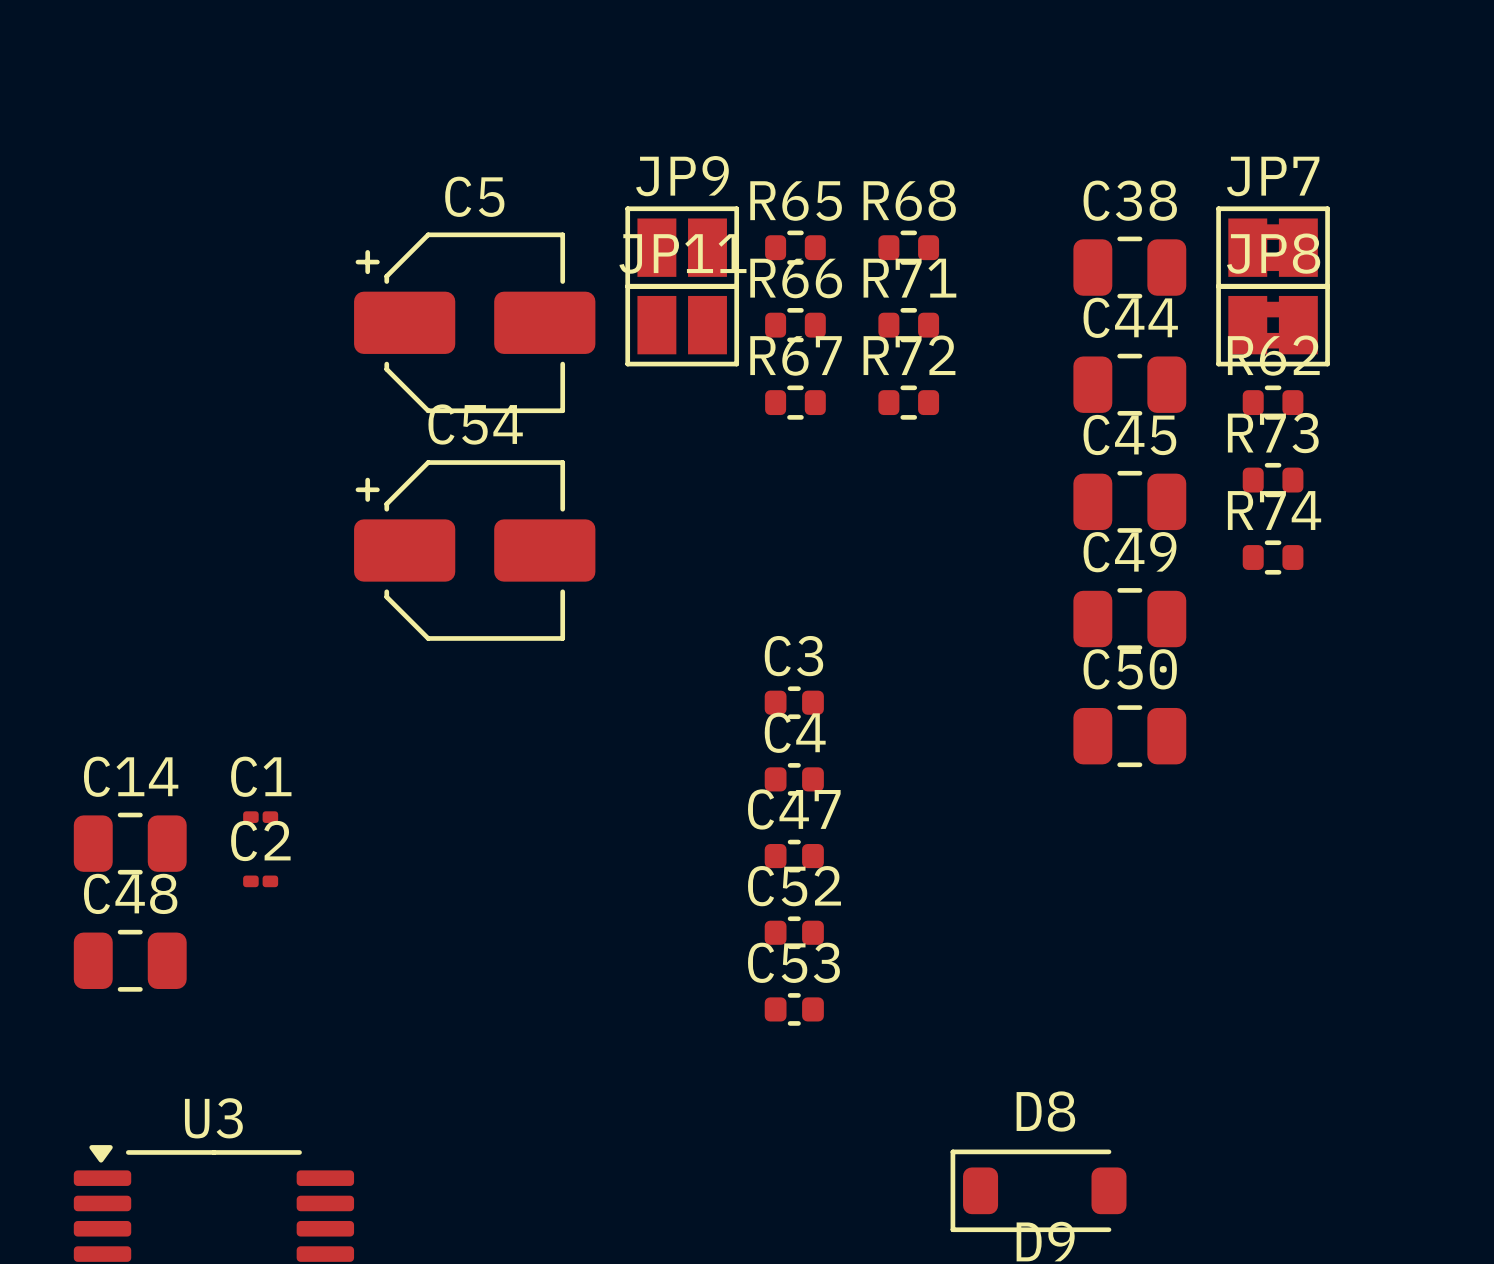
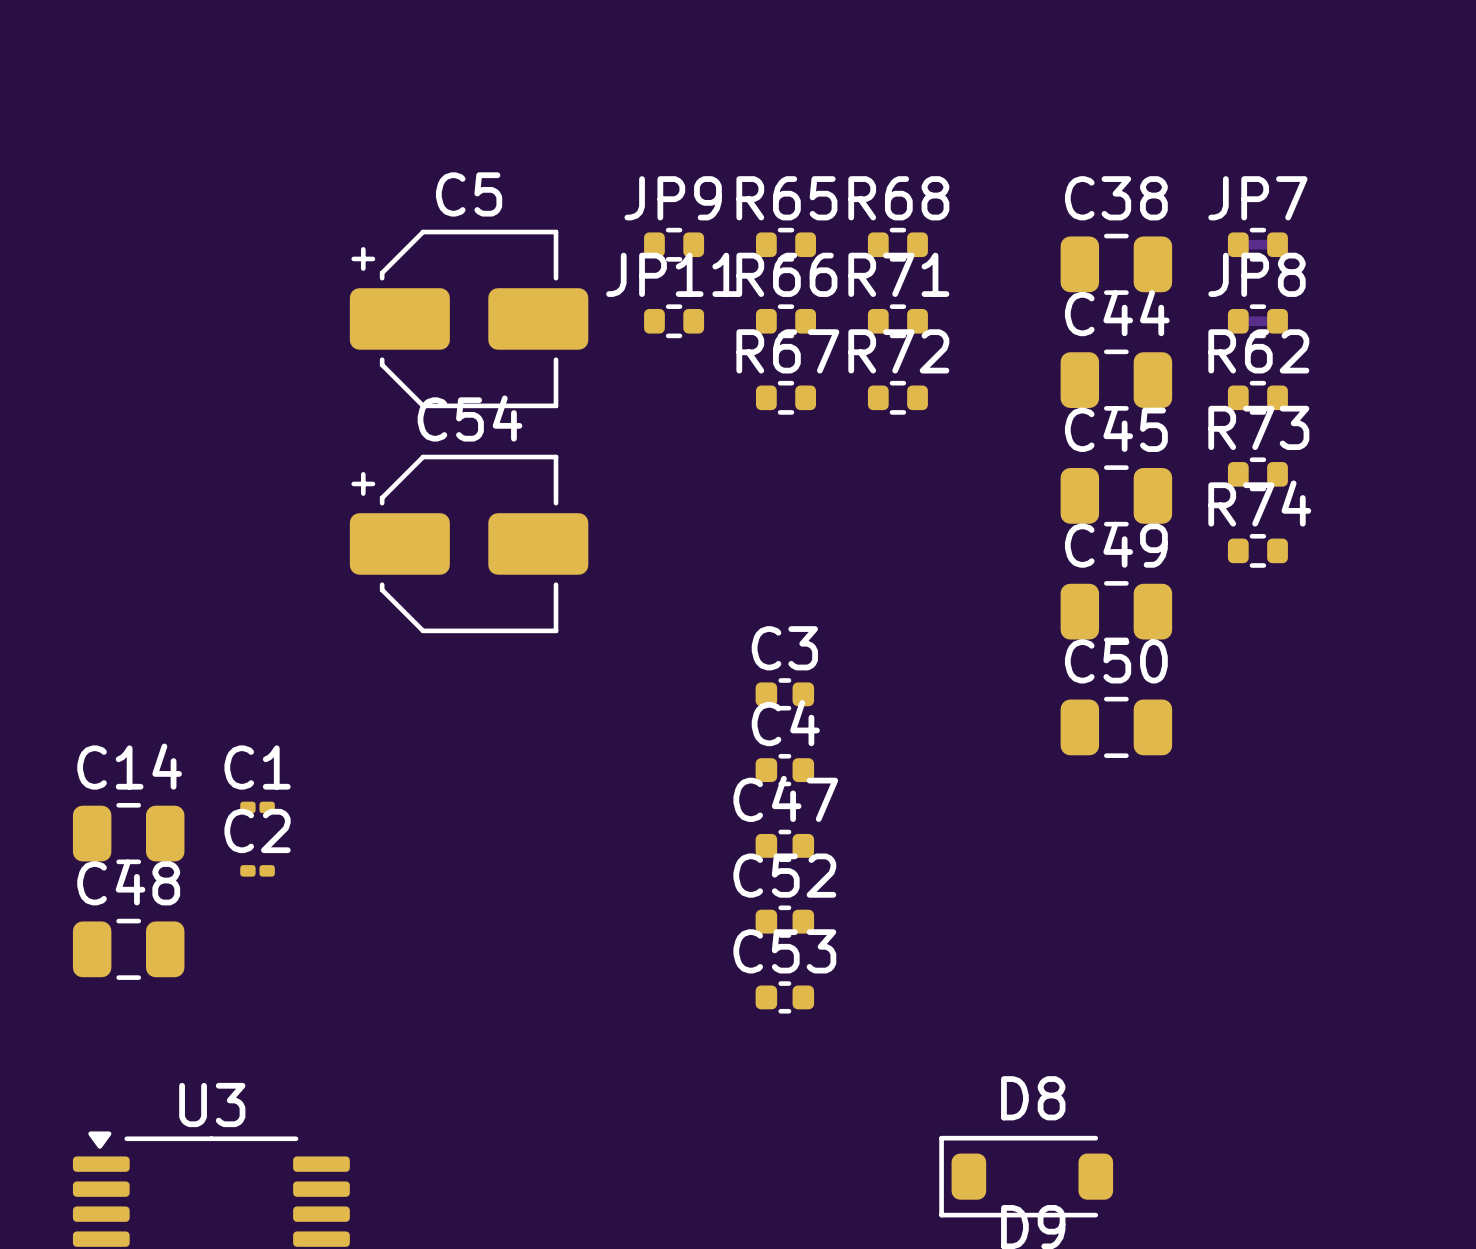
JP9 footprint: [625, 206, 740, 289] -> [644, 227, 705, 262]
JP7 footprint: [1216, 206, 1330, 289] -> [1227, 227, 1288, 262]
JP11 footprint: [625, 283, 740, 367] -> [644, 304, 705, 339]
JP8 footprint: [1216, 283, 1330, 367] -> [1227, 304, 1288, 339]

